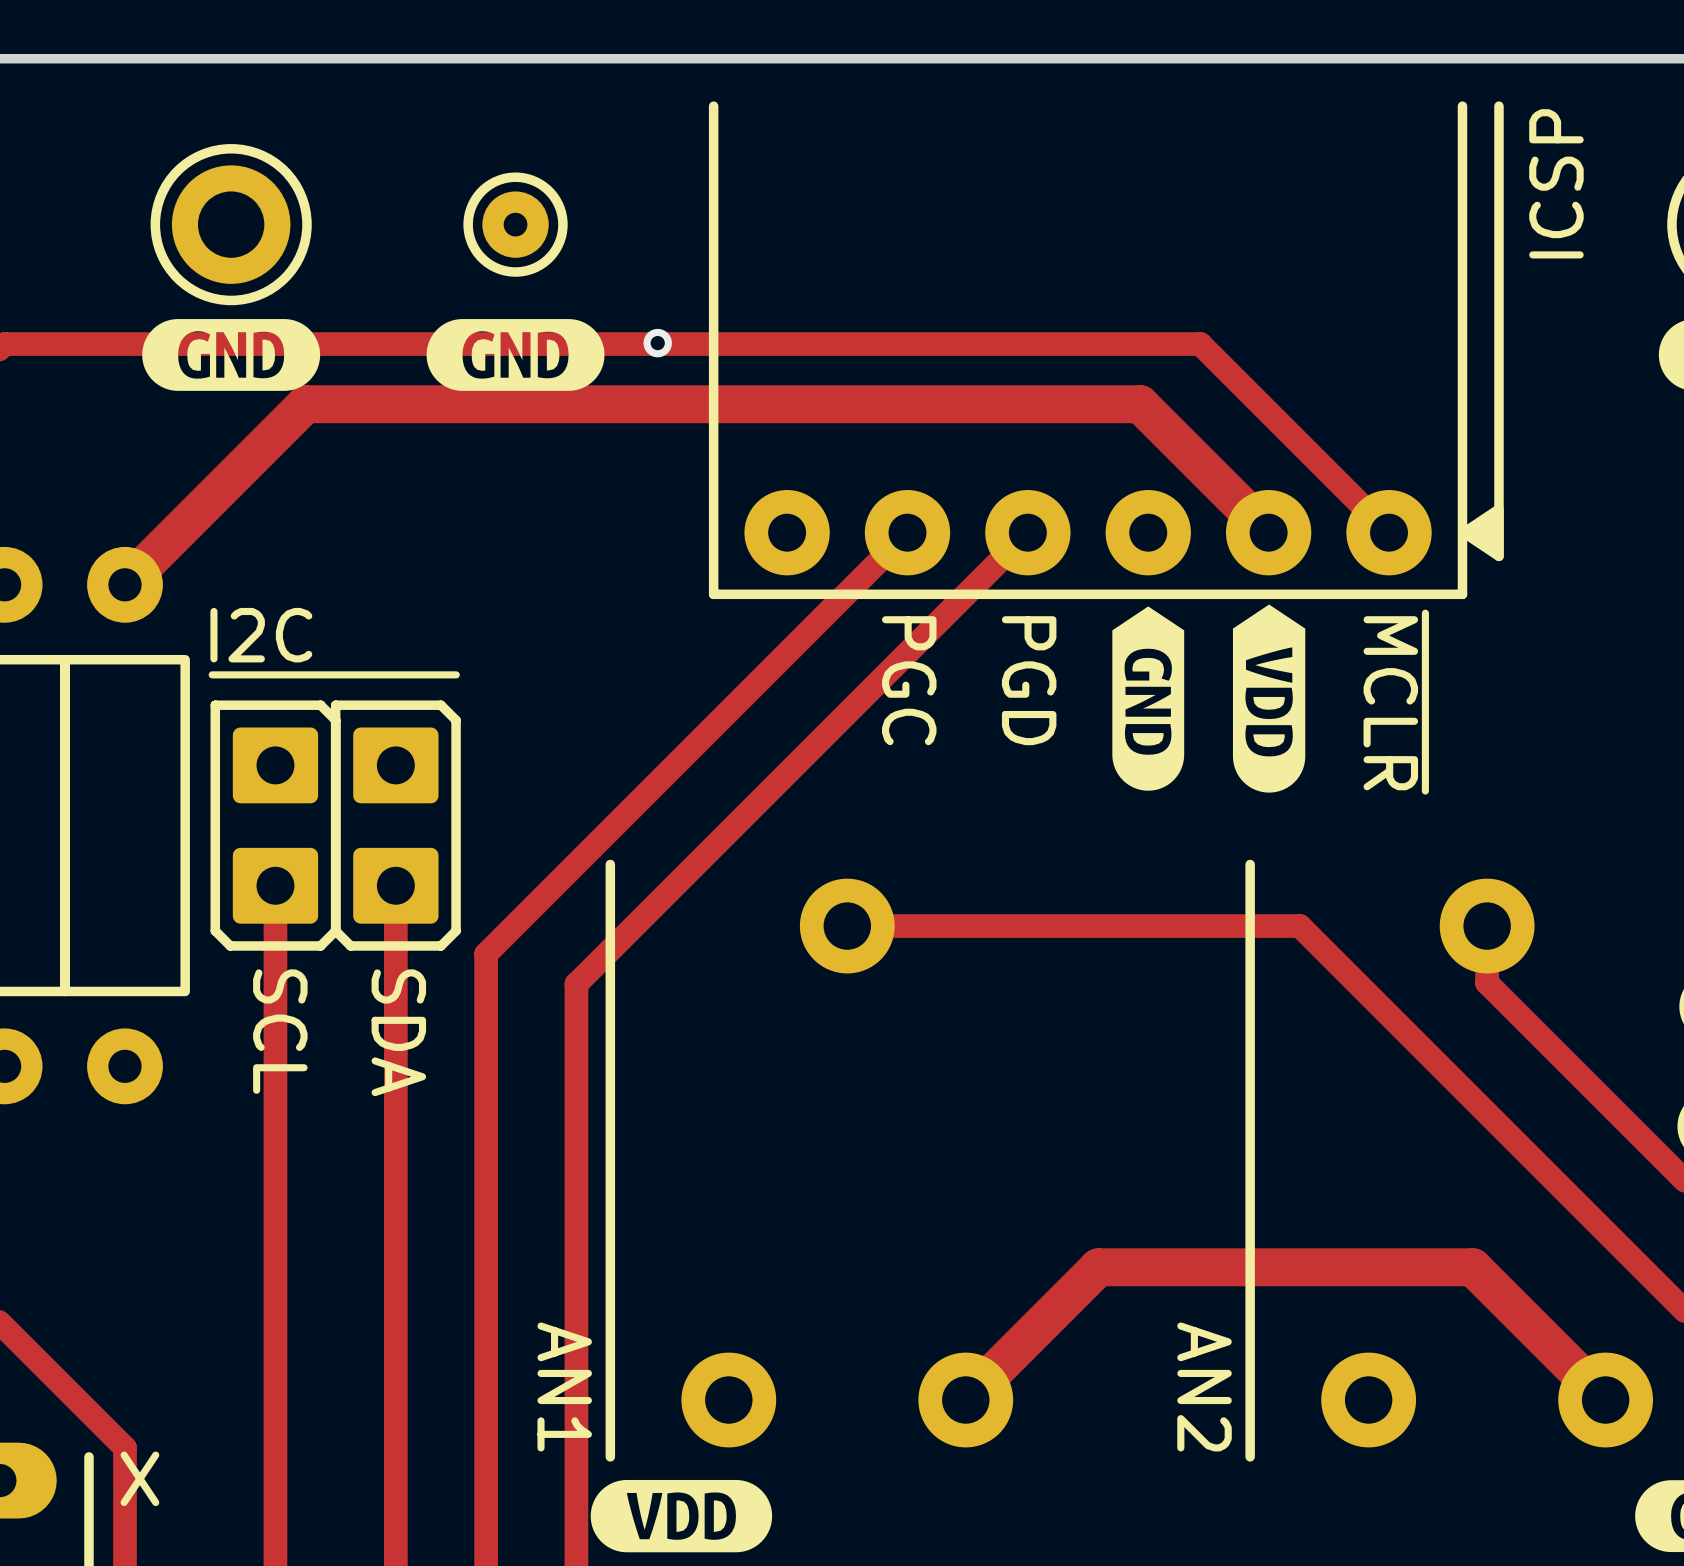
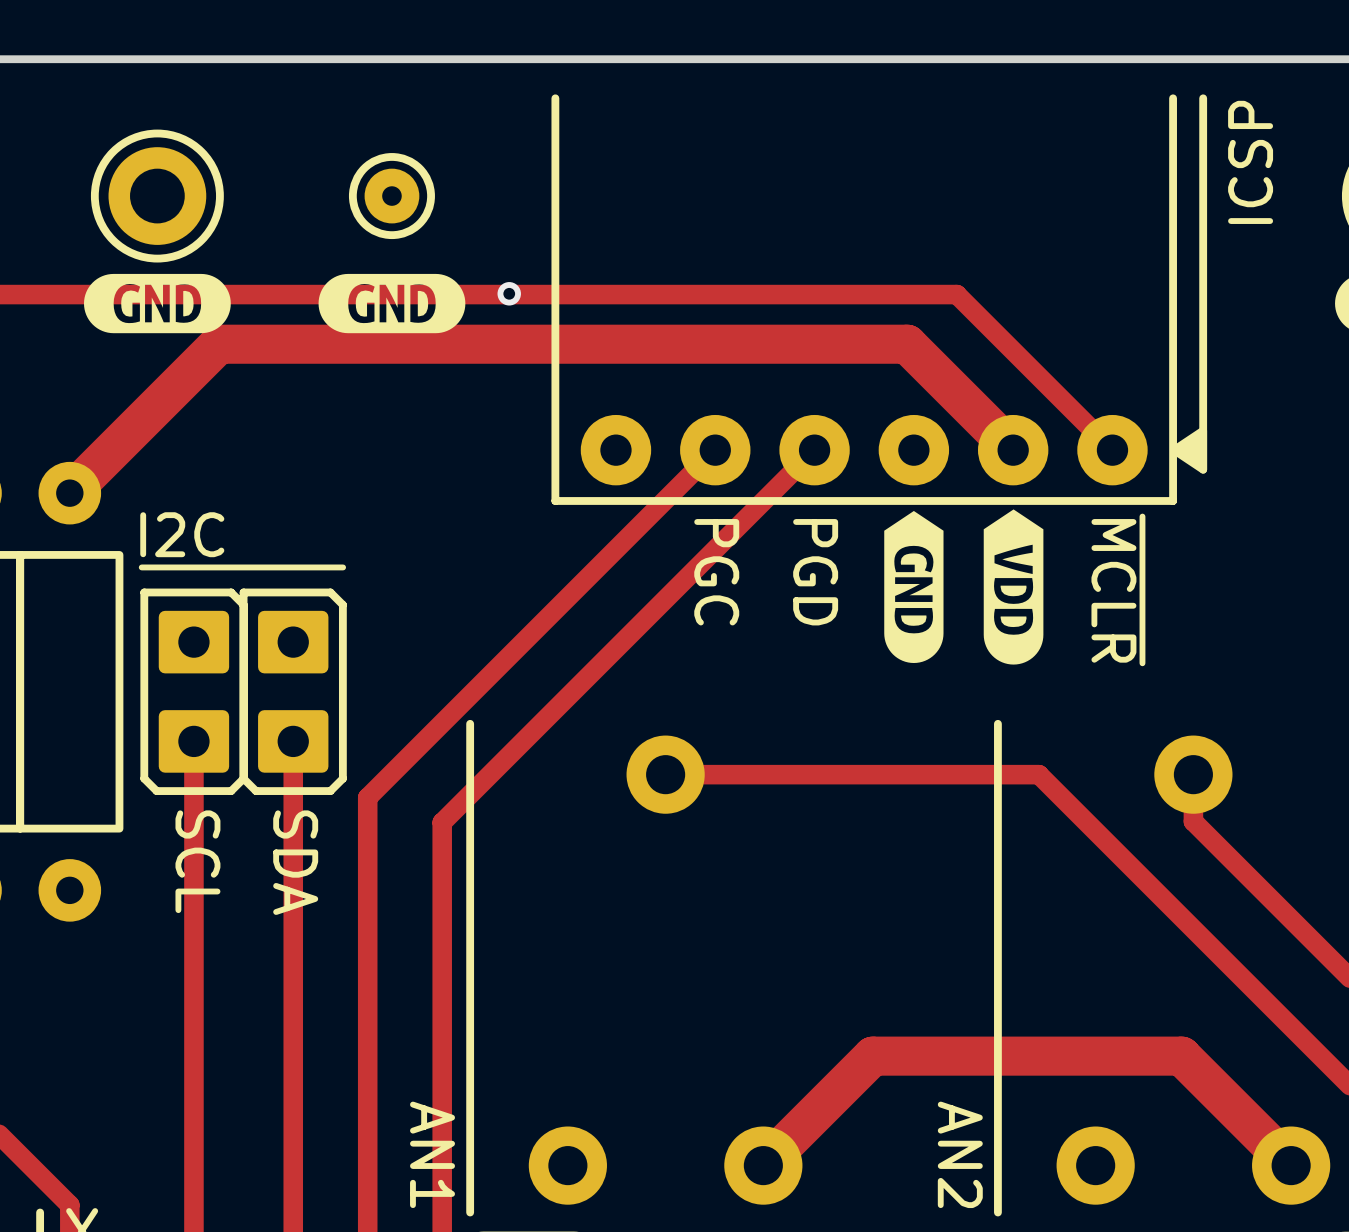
track width: thin (1268, 532) (1140, 404) (305, 404) (125, 584) -> thick (1013, 450) (907, 344) (218, 344) (69, 493)
track width: thin (965, 1400) (1098, 1267) (1472, 1267) (1605, 1400) -> thick (763, 1165) (872, 1056) (1181, 1056) (1291, 1165)

